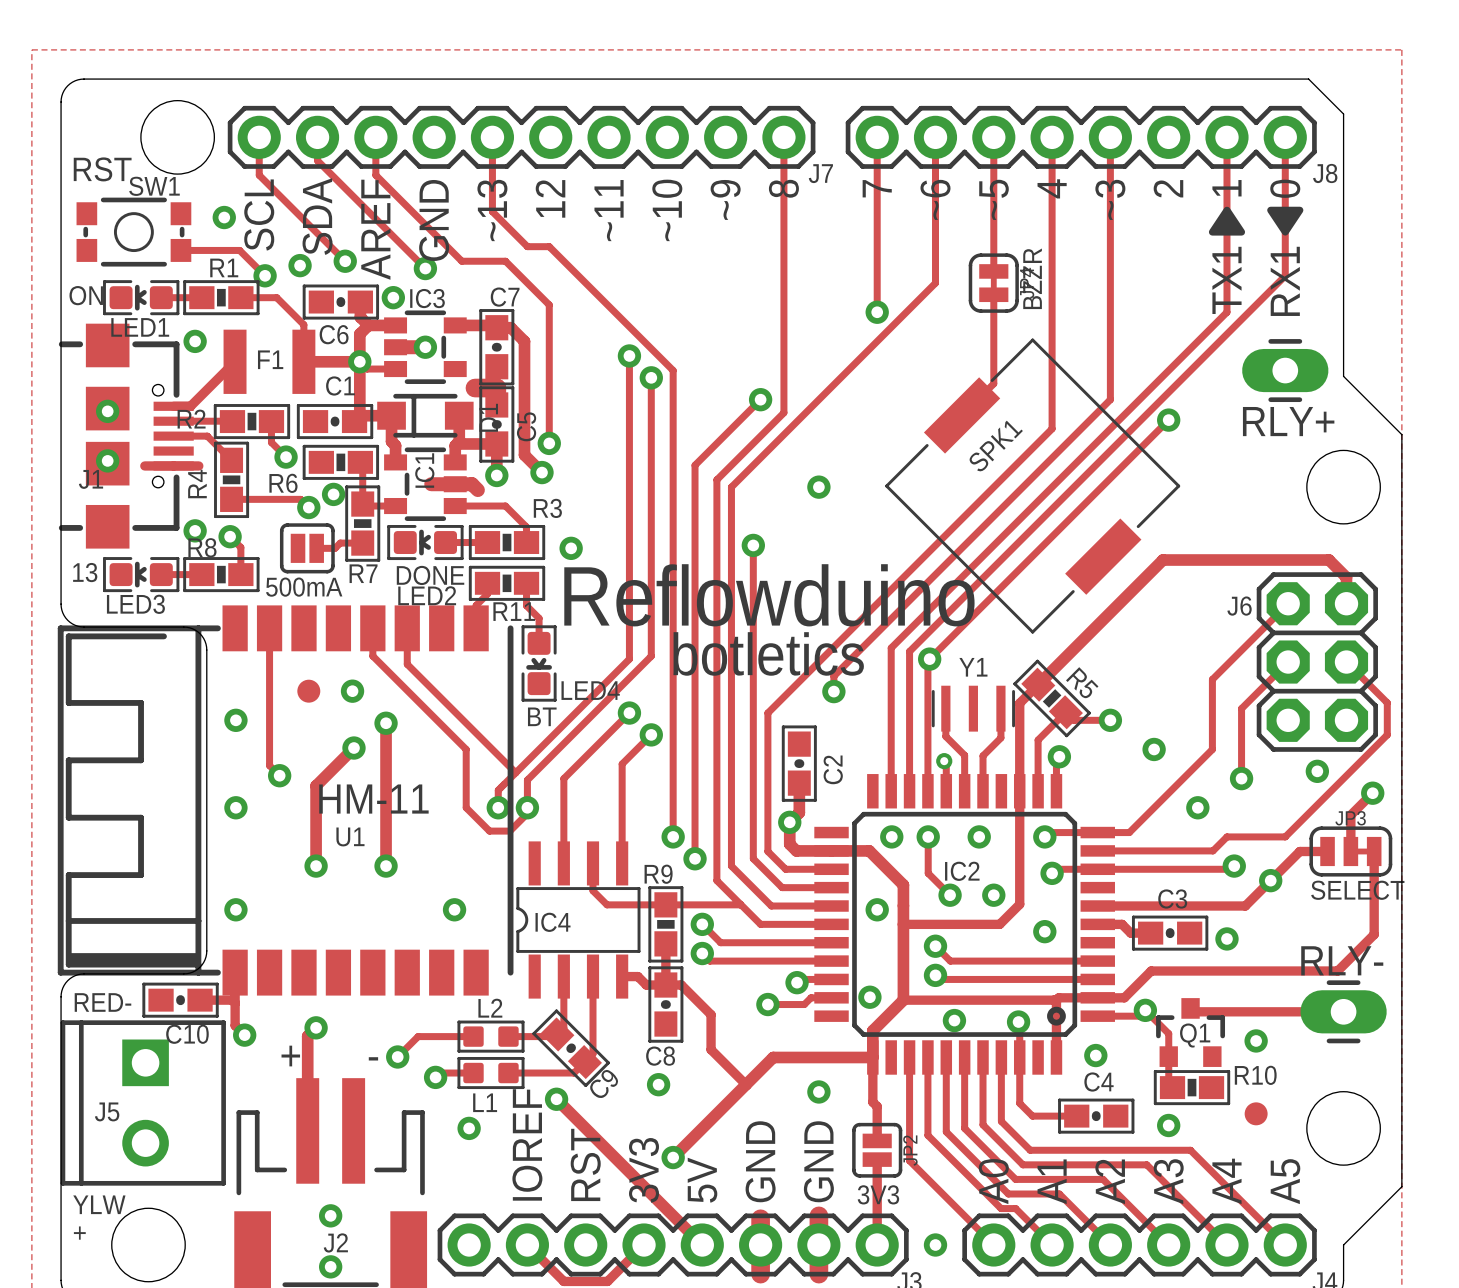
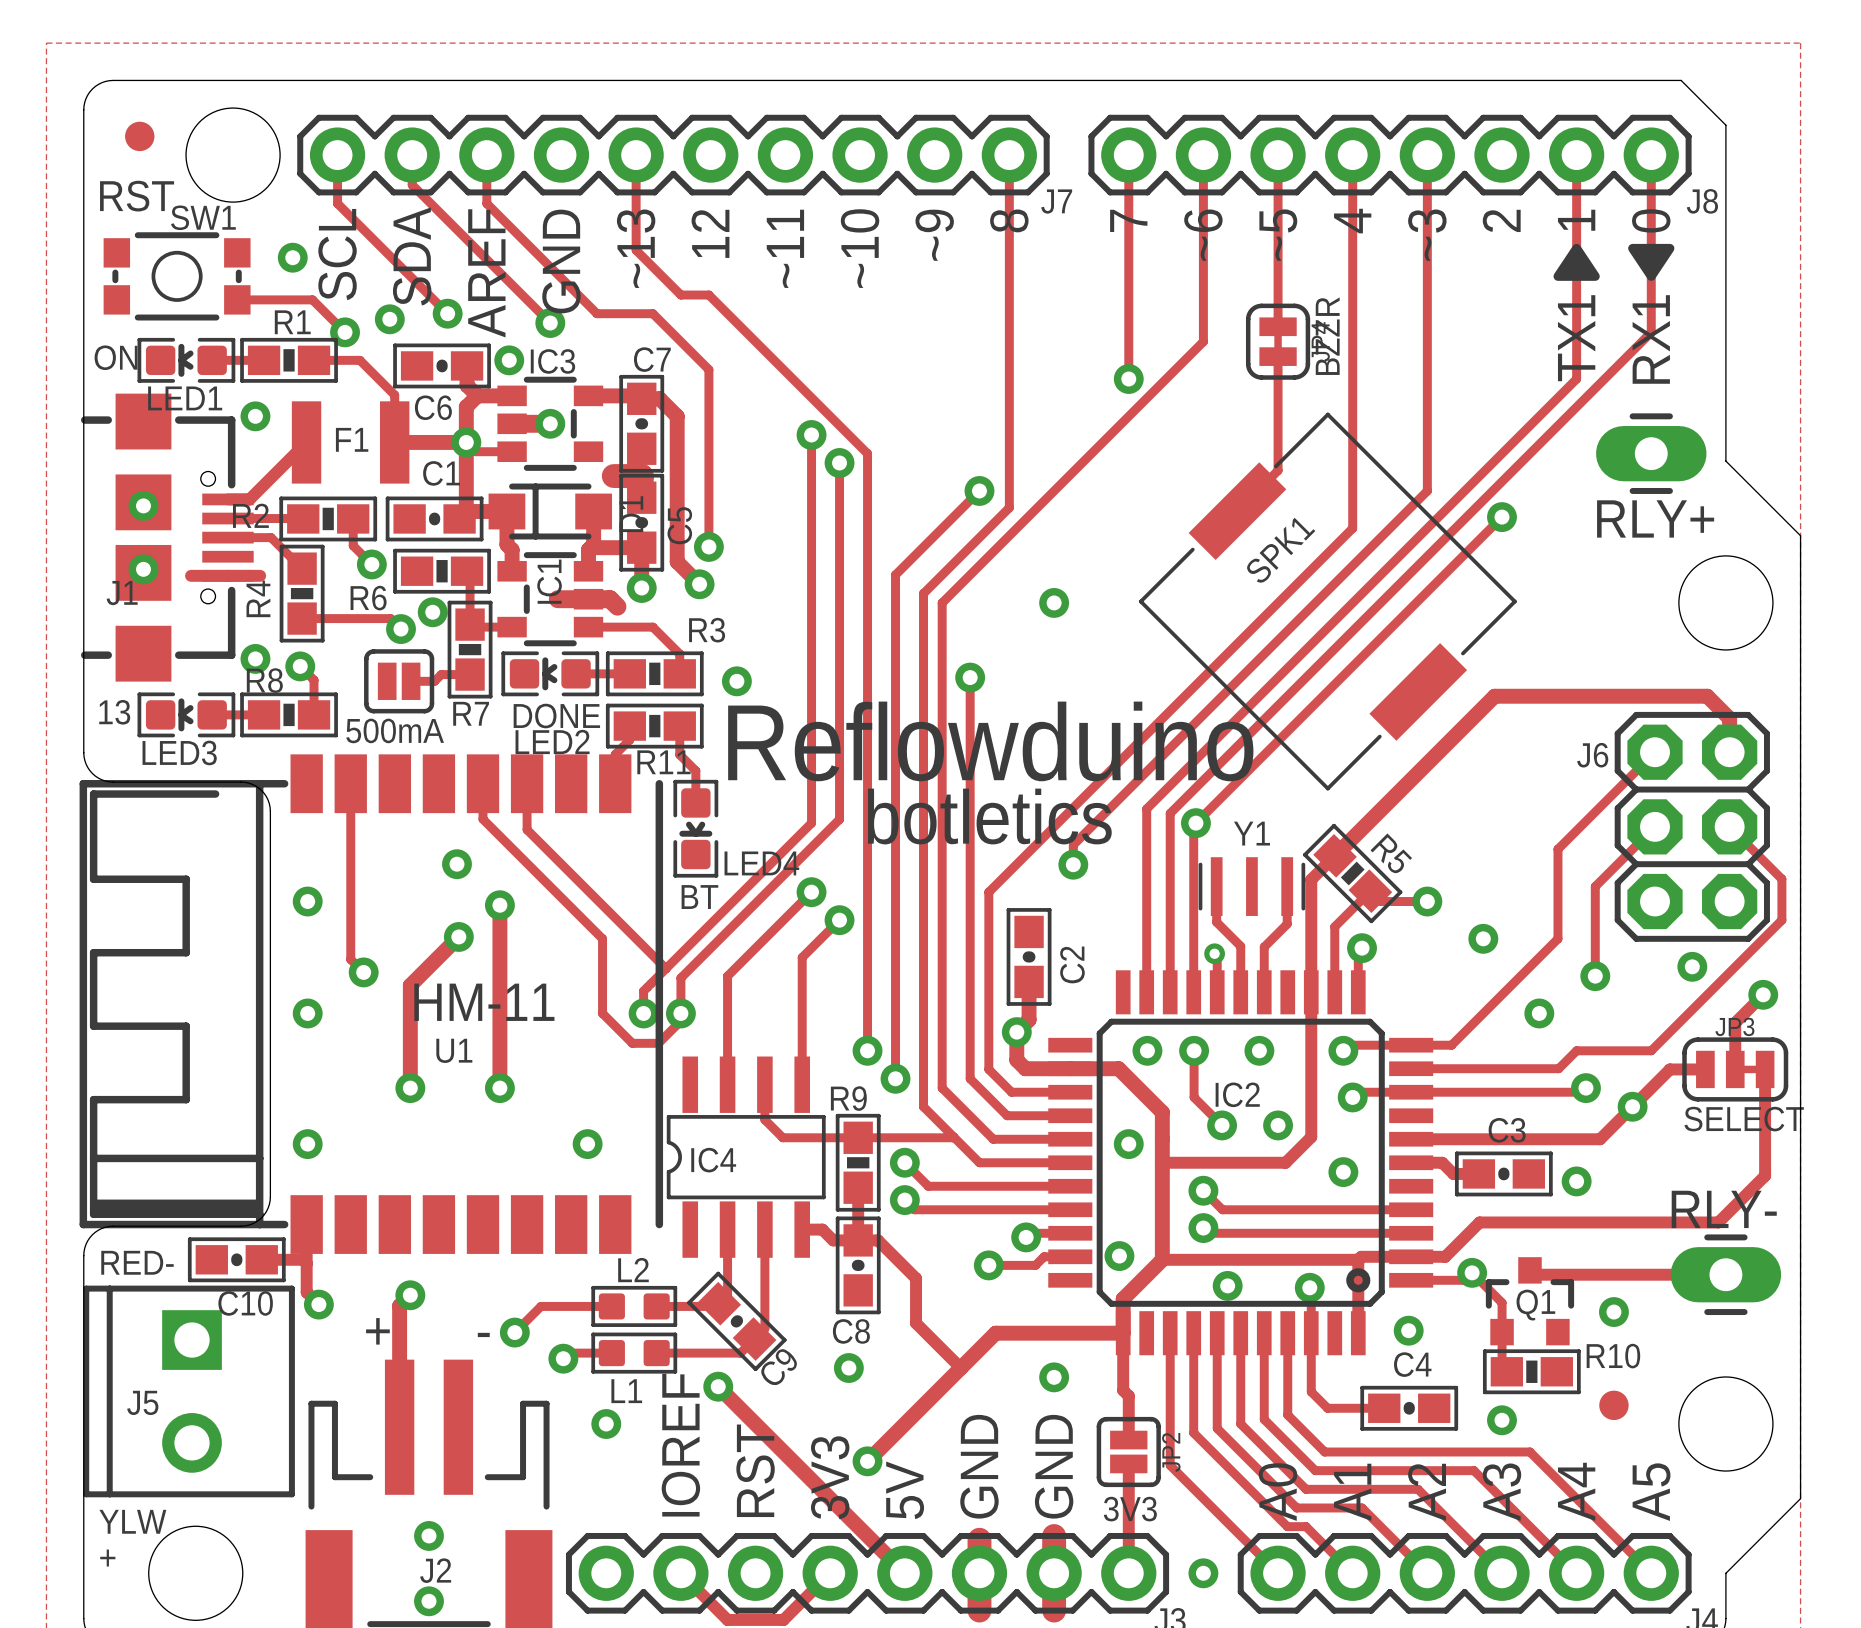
part: none -> (139, 136)
part: (308, 691) -> none

